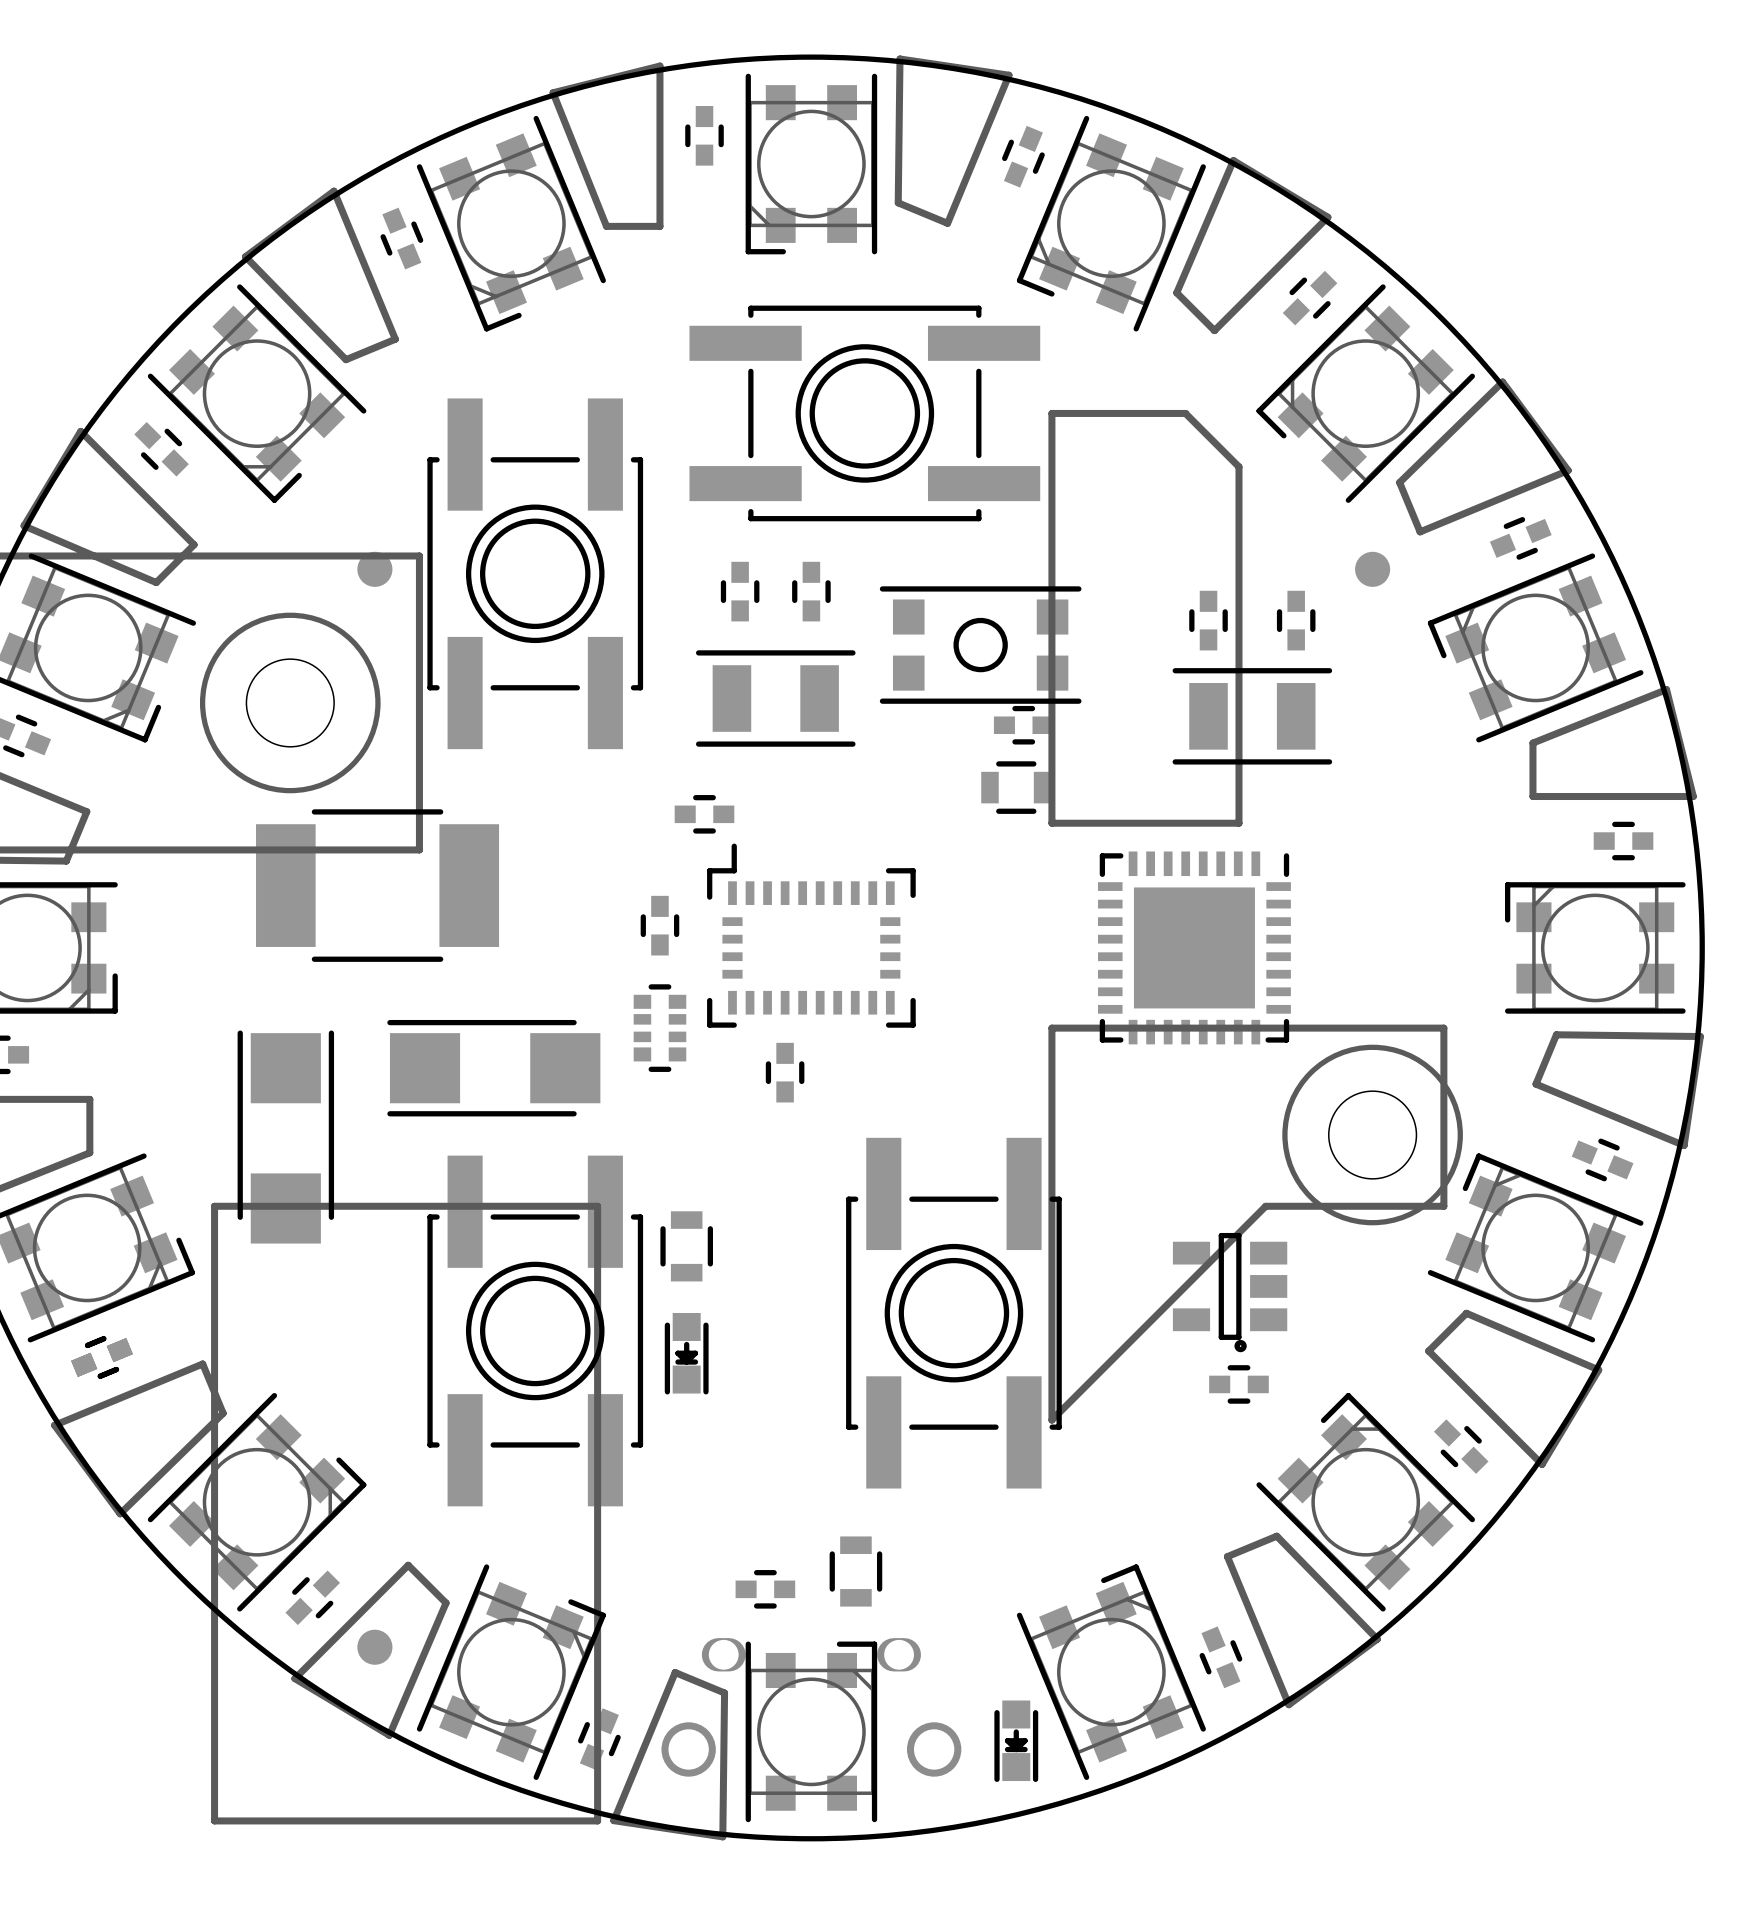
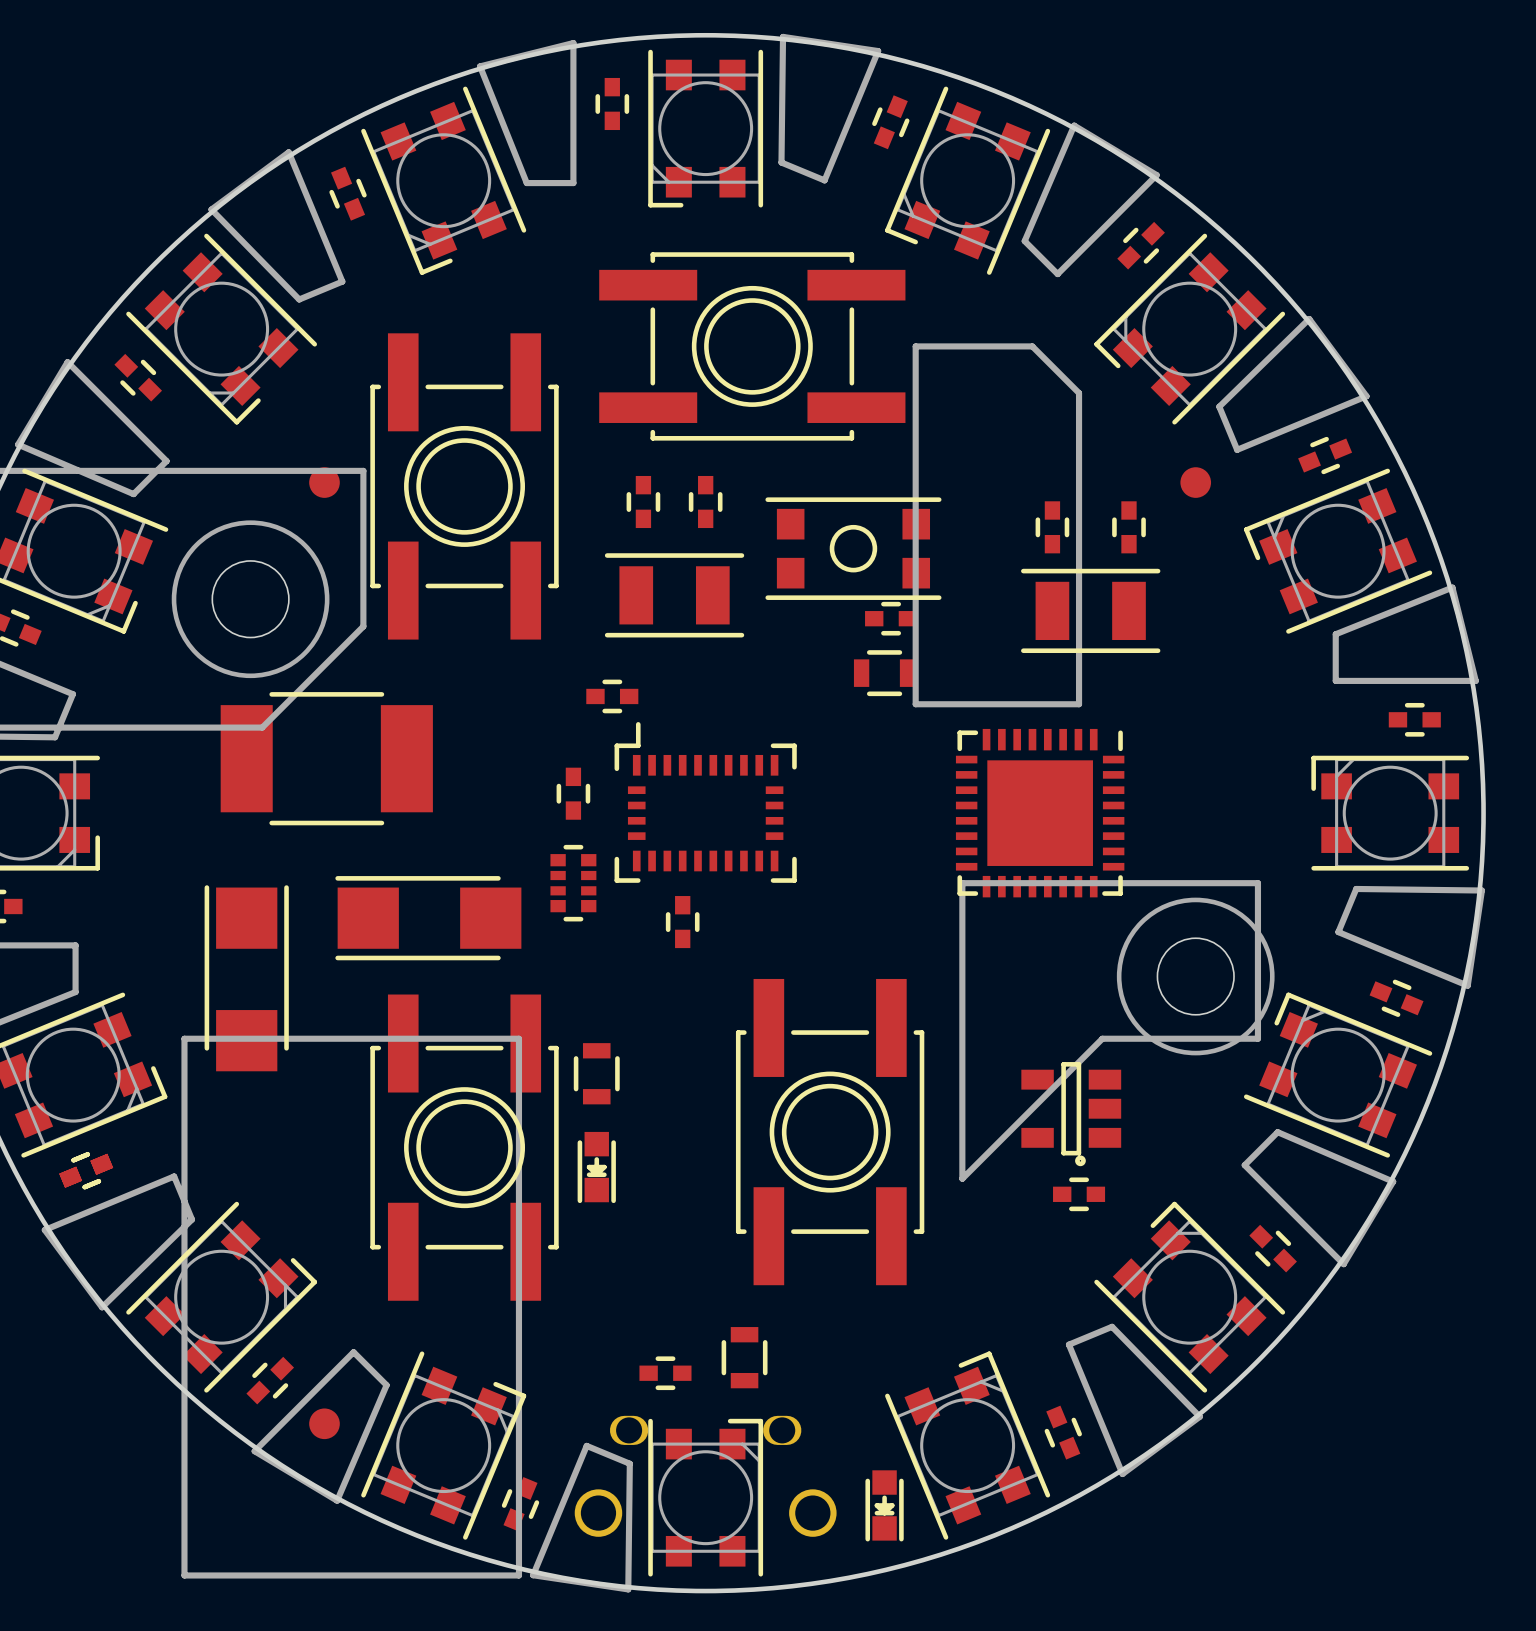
line: (419, 734) (419, 849) (303, 849) -> (363, 626) (262, 727)
line: (1105, 1028) (1051, 1028) (1051, 1420) (1105, 1366) -> (962, 883) (962, 1178)

